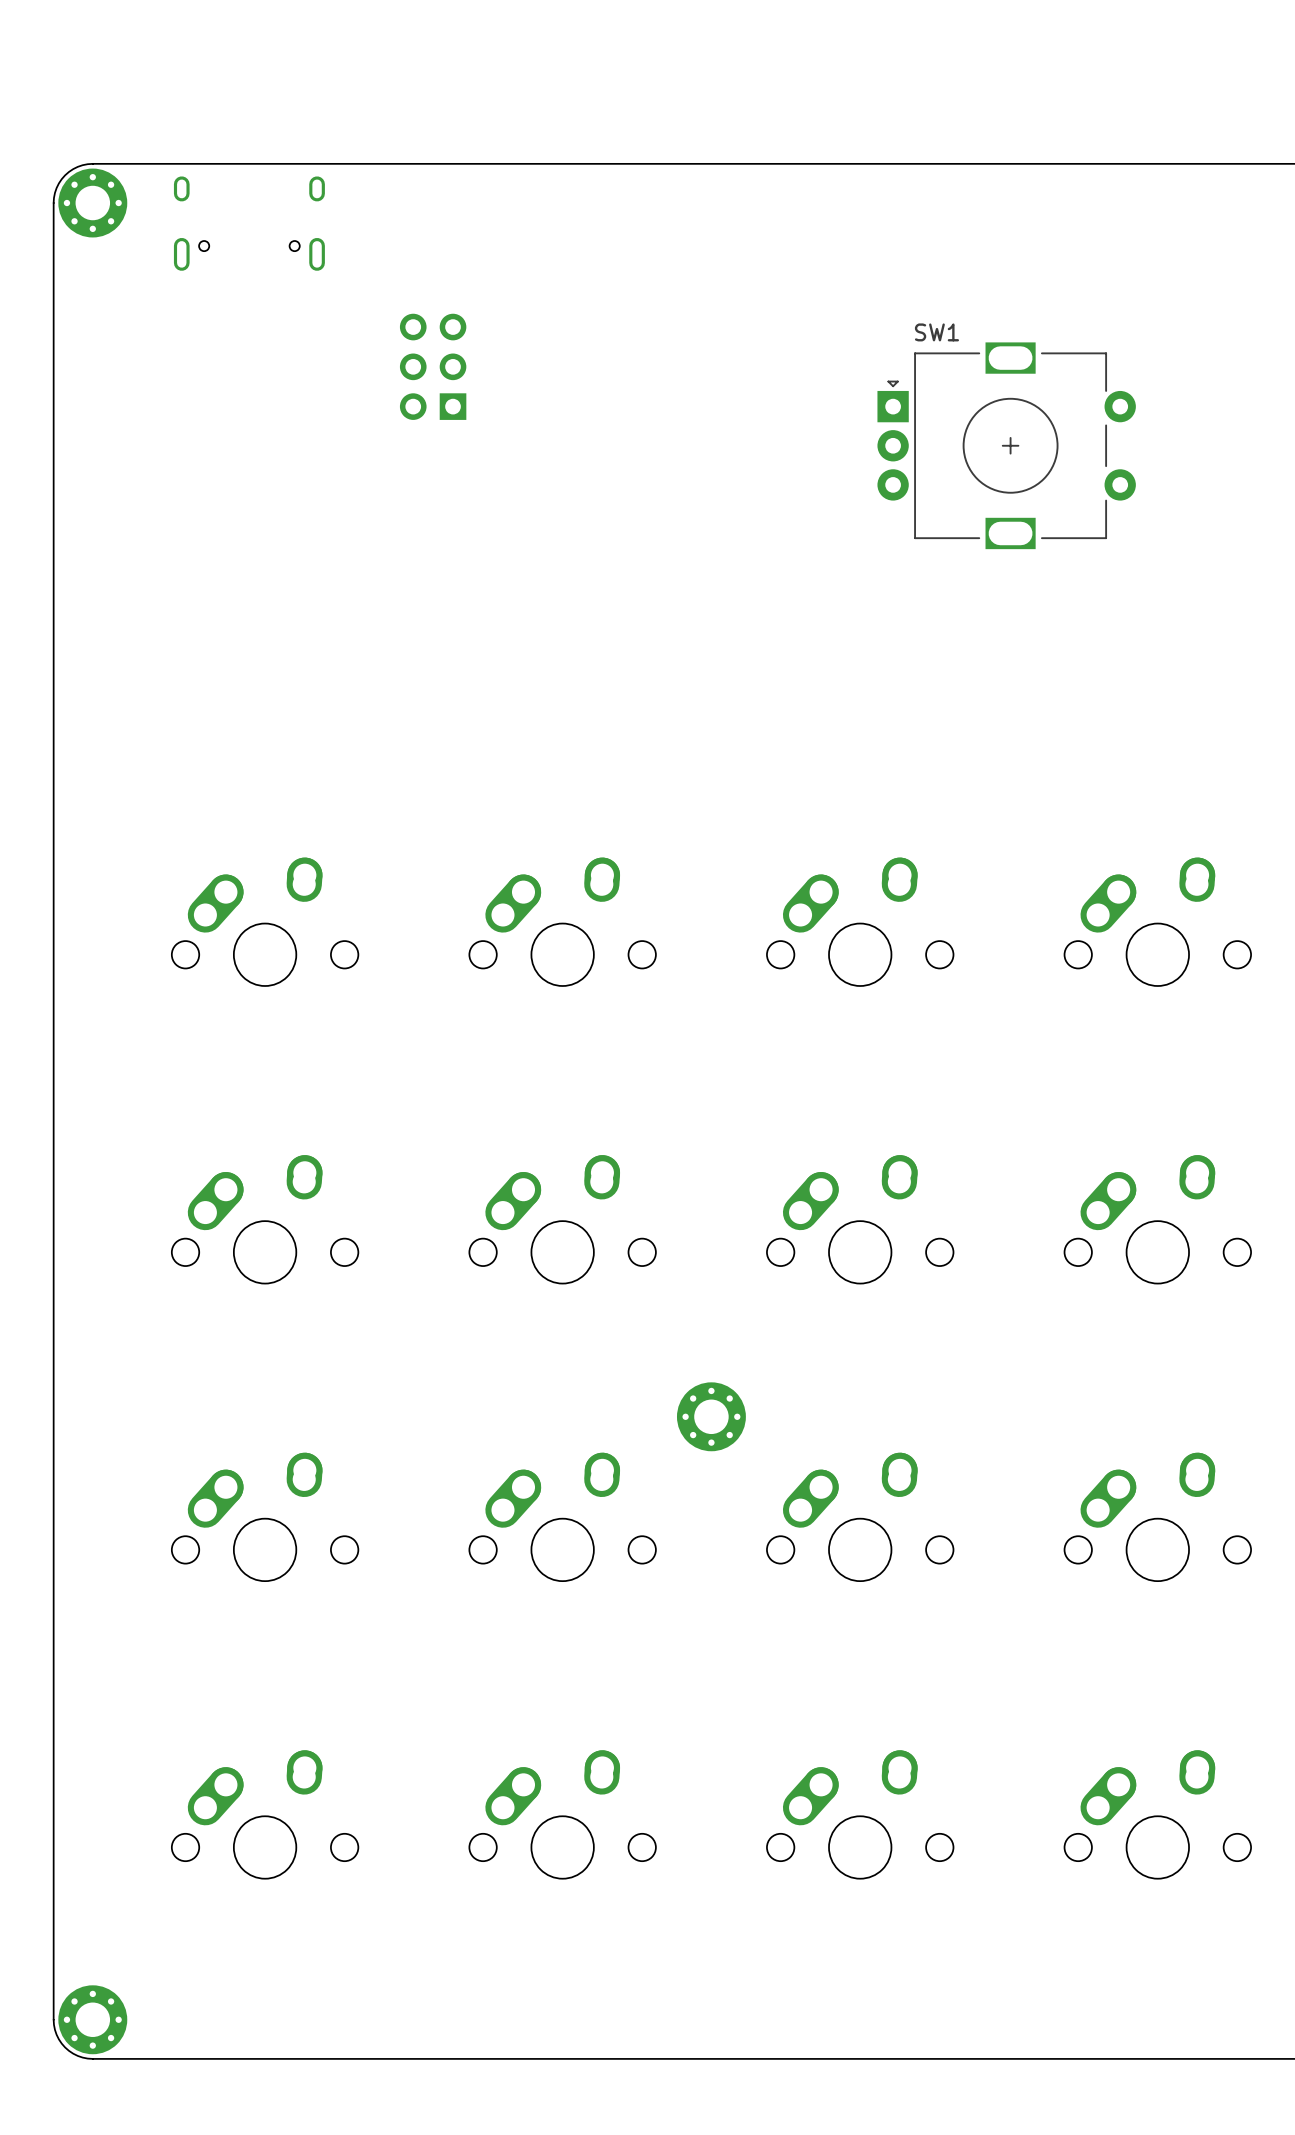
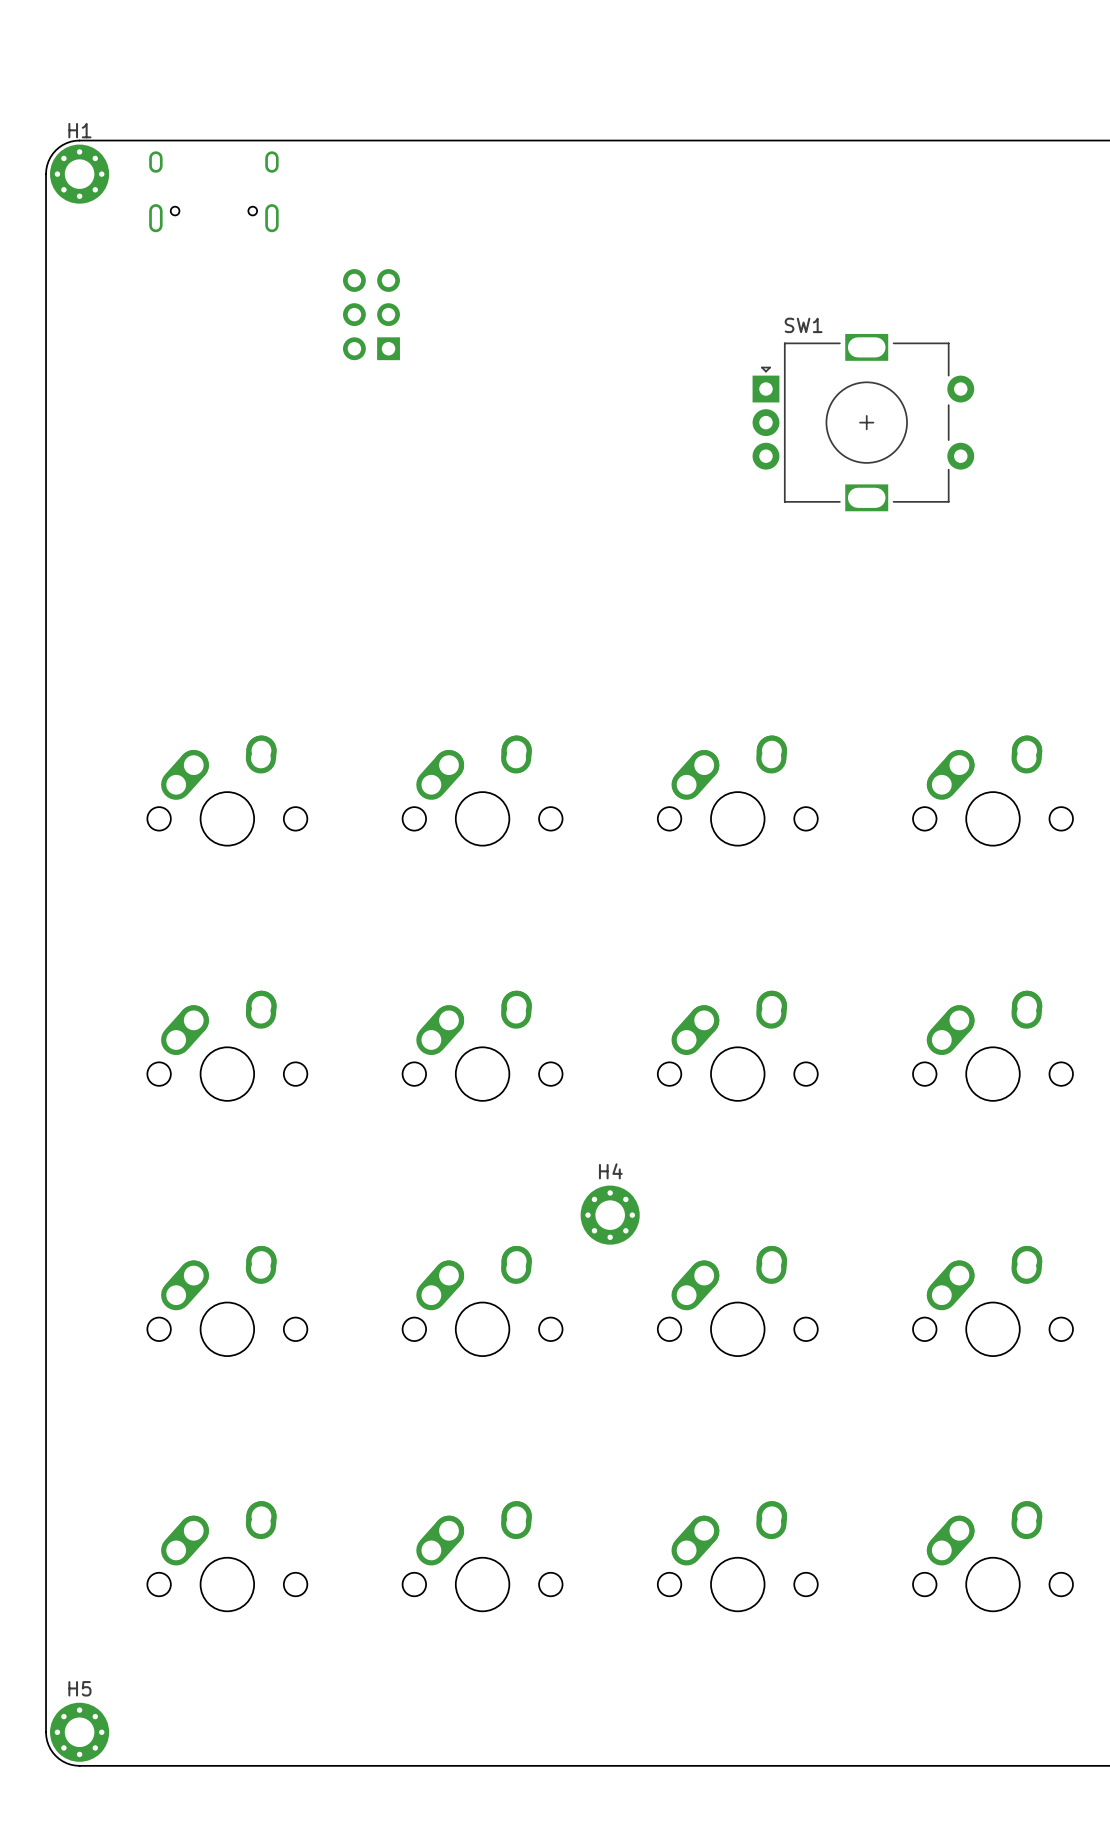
H1 name: none -> H1 (79, 130)
SW1 position: (1006, 445) -> (863, 422)
H4 name: none -> H4 (610, 1171)
H5 name: none -> H5 (79, 1688)

